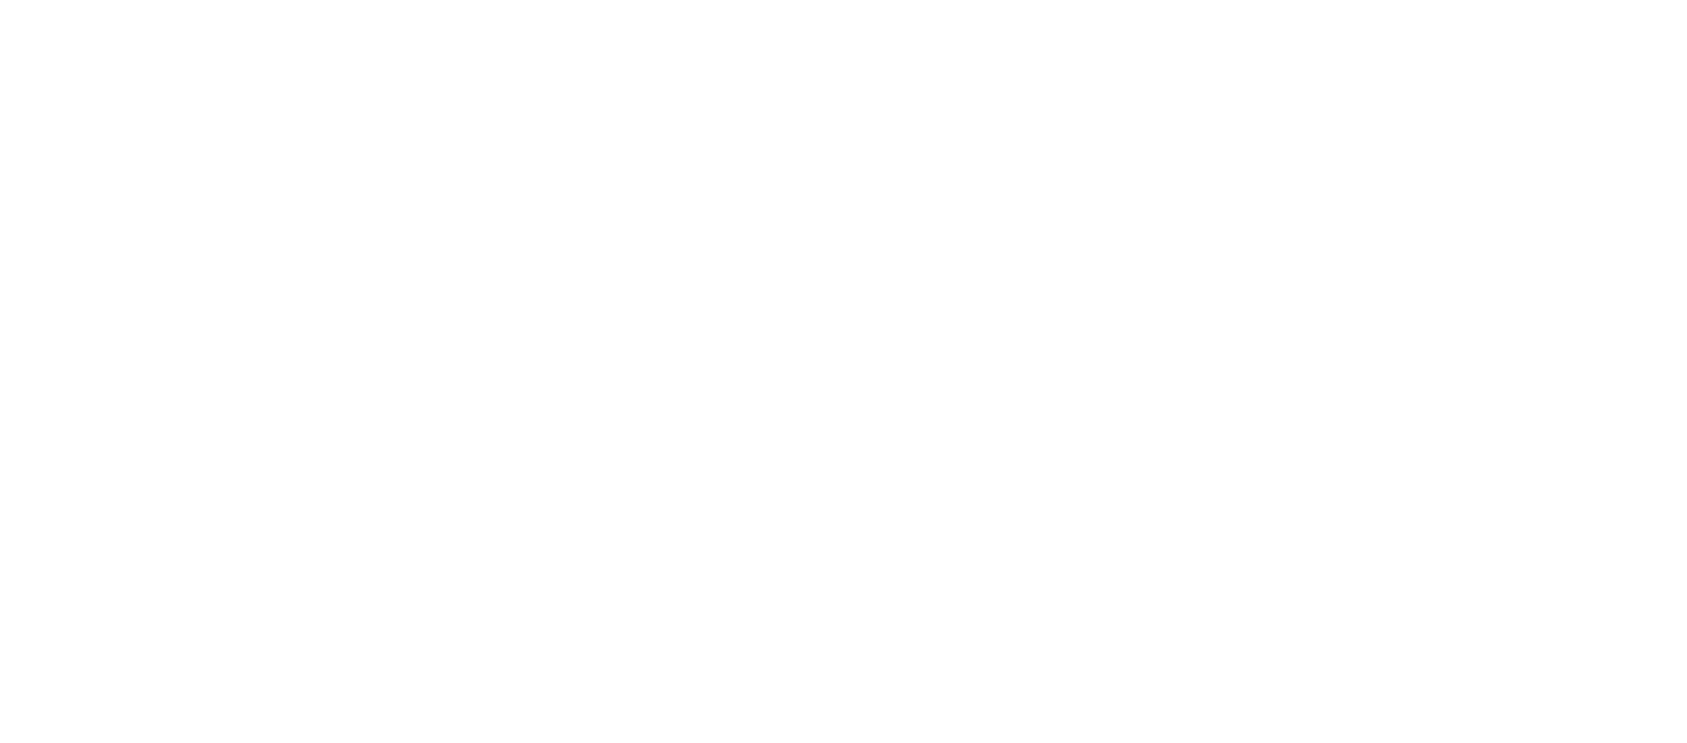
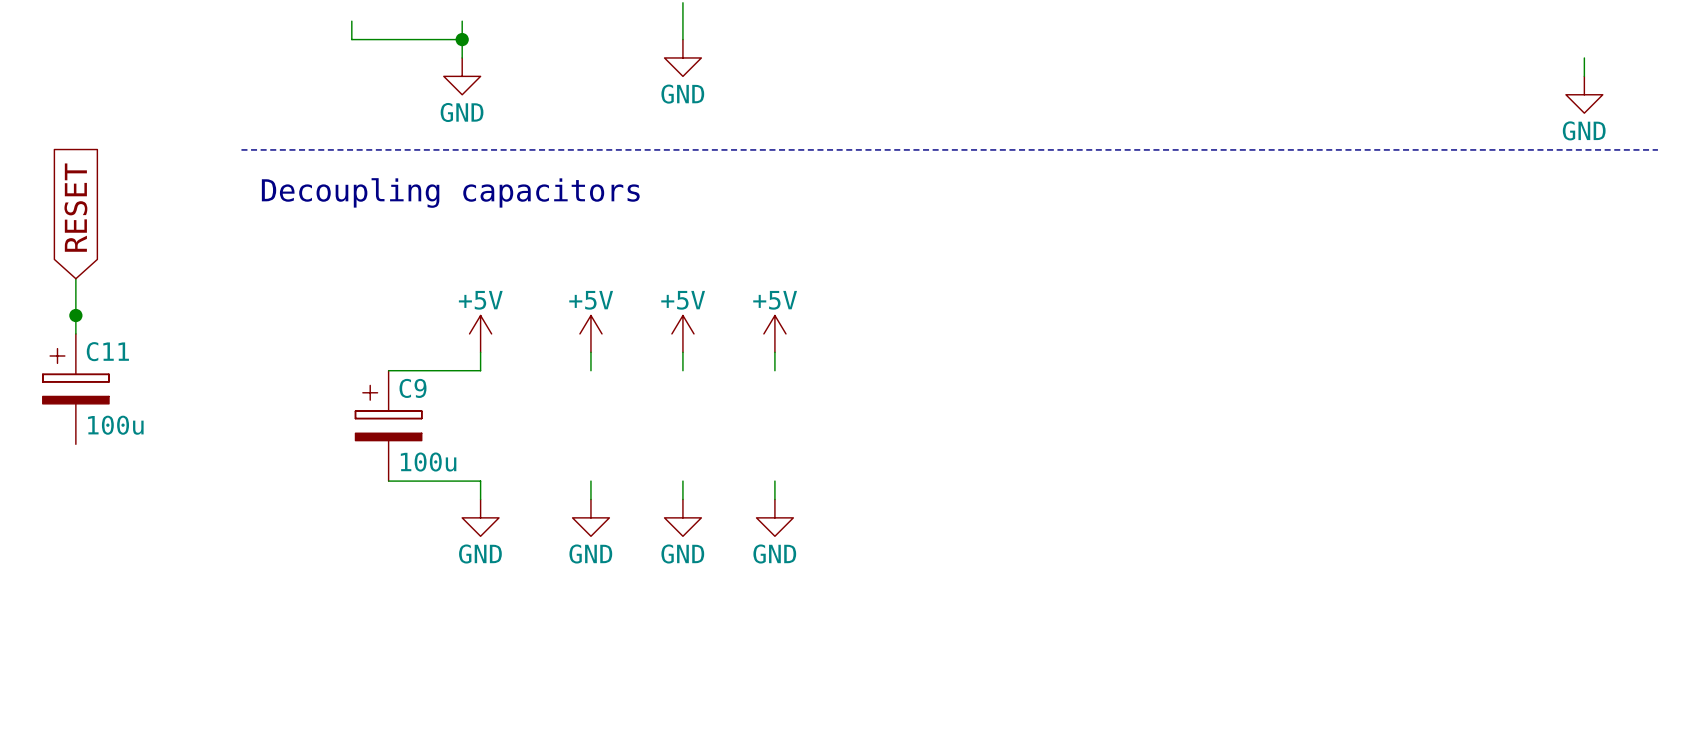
wire: none -> (682, 2) (682, 39)
wire: none -> (351, 21) (351, 39) (462, 39)
wire: none -> (462, 21) (462, 57)
junction: none -> (462, 39)
power symbol: none -> GND (682, 57)
wire: none -> (1584, 57) (1584, 76)
power symbol: none -> GND (462, 76)
power symbol: none -> GND (1584, 94)
line: none -> (241, 149) (1657, 149)
text: none -> Decoupling capacitors (450, 192)
global label: none -> RESET (75, 207)
wire: none -> (75, 278) (75, 333)
junction: none -> (75, 315)
power symbol: none -> +5V (480, 333)
power symbol: none -> +5V (590, 333)
power symbol: none -> +5V (682, 333)
power symbol: none -> +5V (774, 333)
wire: none -> (480, 352) (480, 370) (388, 370)
wire: none -> (590, 352) (590, 370)
wire: none -> (682, 352) (682, 370)
wire: none -> (774, 352) (774, 370)
C11: none -> 100u (75, 389)
C9: none -> 100u (388, 425)
wire: none -> (388, 481) (480, 481) (480, 499)
wire: none -> (590, 481) (590, 499)
wire: none -> (682, 481) (682, 499)
wire: none -> (774, 481) (774, 499)
power symbol: none -> GND (480, 517)
power symbol: none -> GND (590, 517)
power symbol: none -> GND (682, 517)
power symbol: none -> GND (774, 517)

